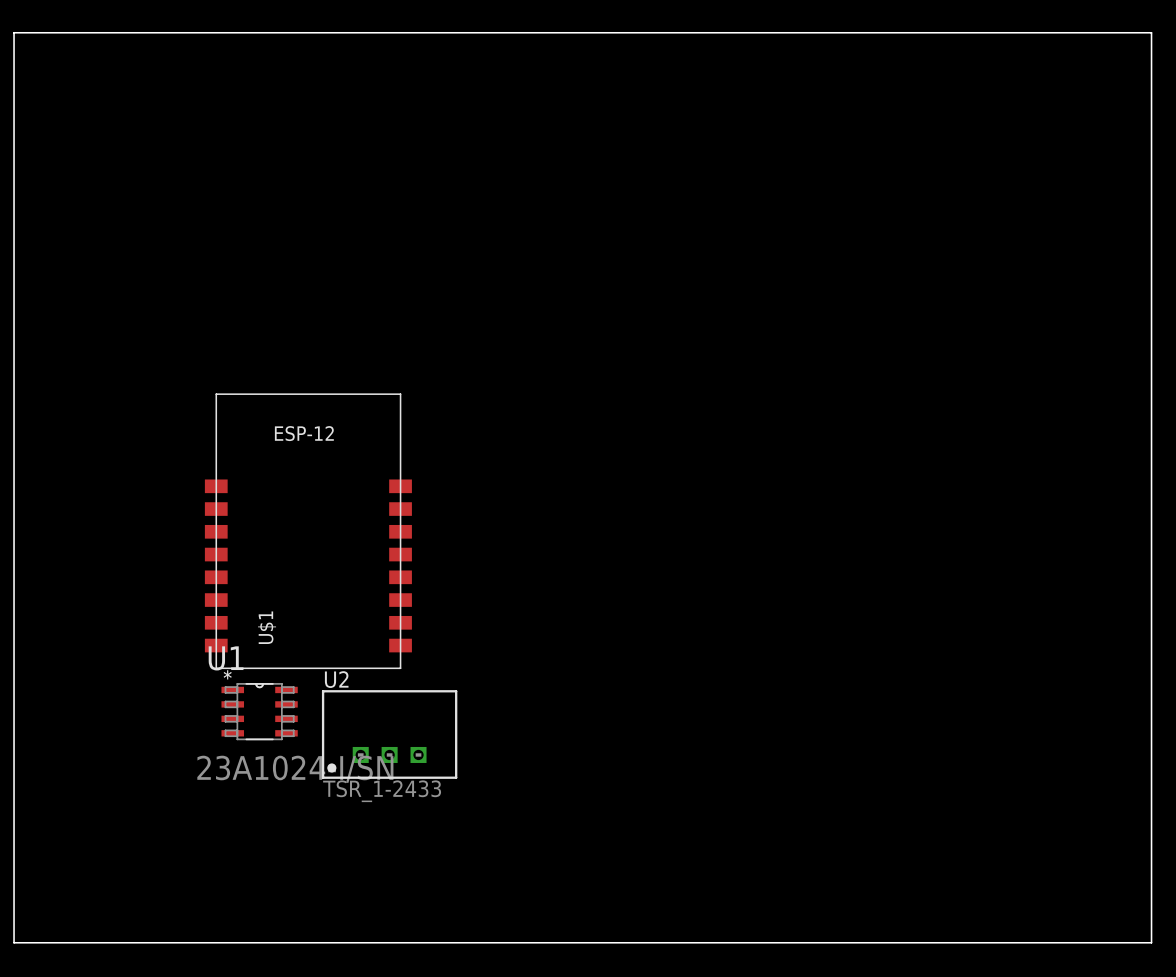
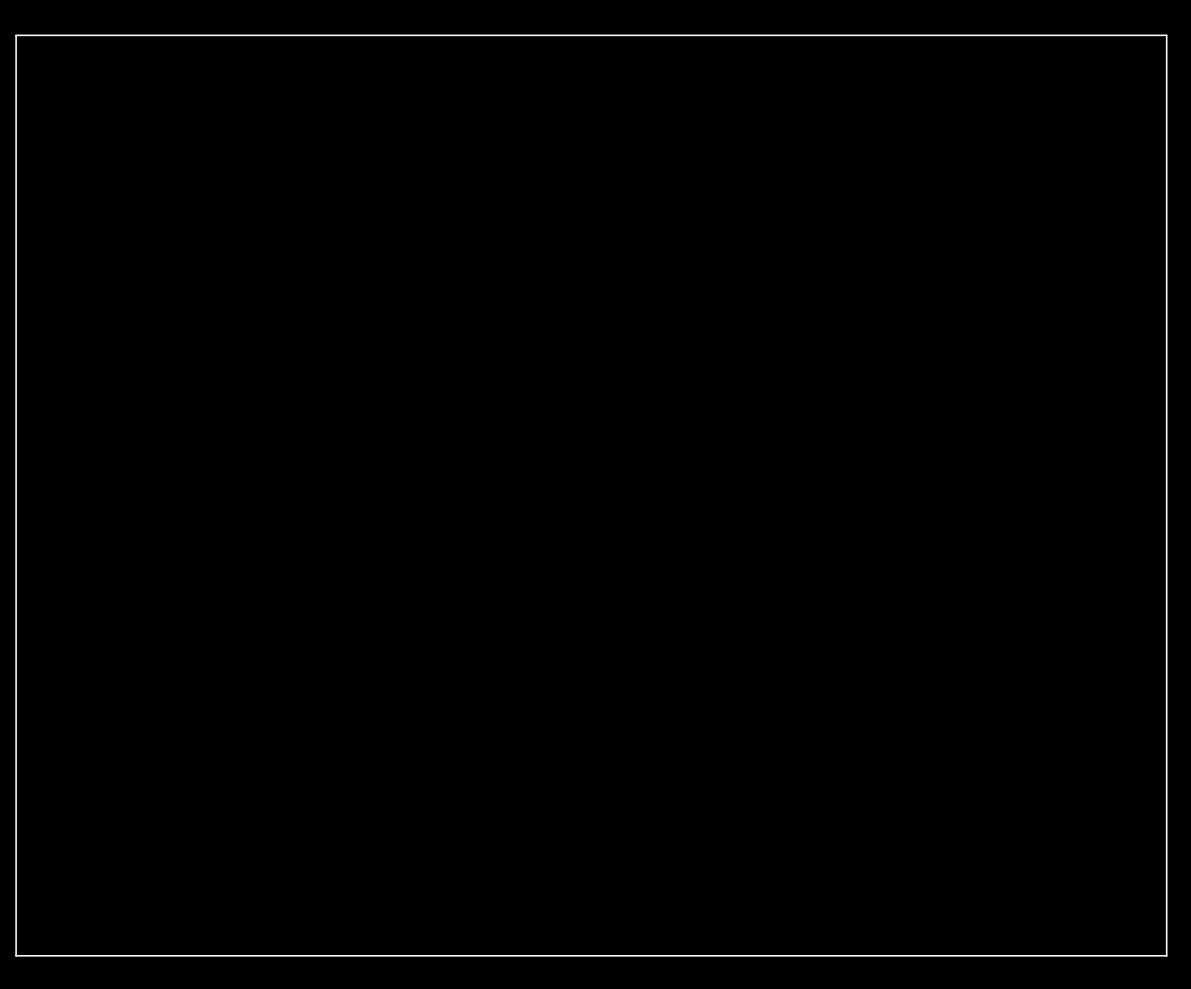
U$1: (308, 531) -> none
U1: 23A1024-I/SN (259, 711) -> none
U2: TSR_1-2433 (389, 734) -> none

